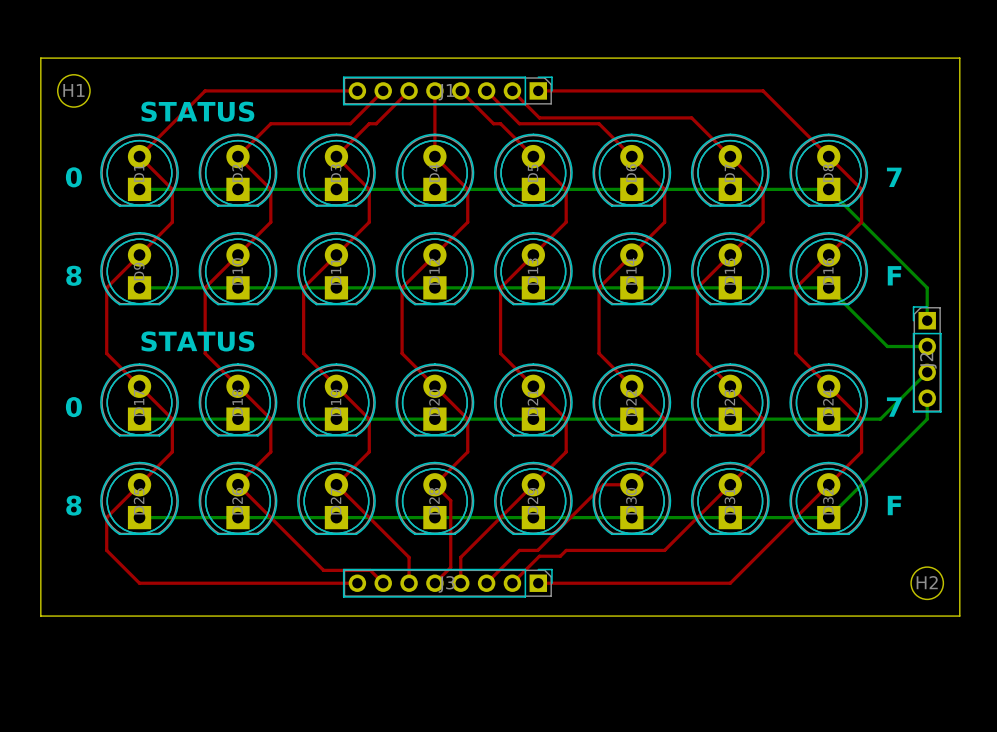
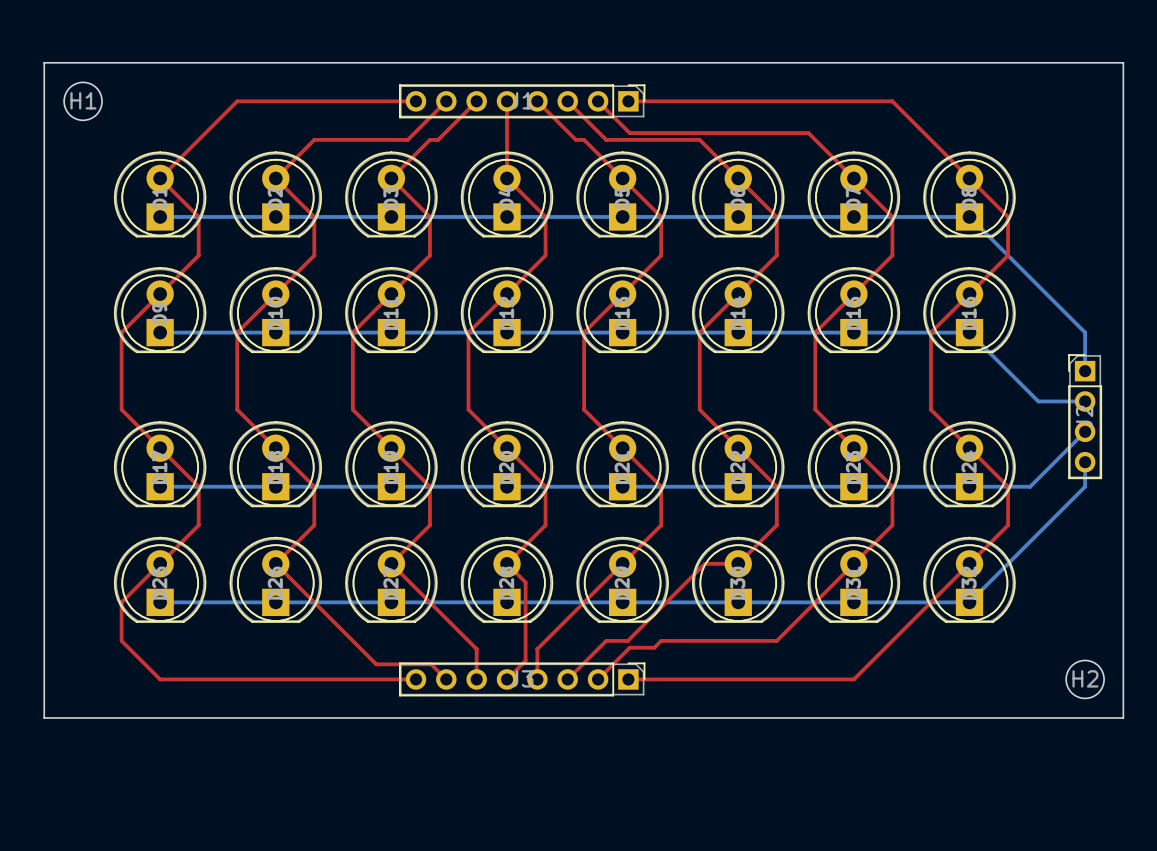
text: STATUS (197, 111) -> none
text: 0 (73, 177) -> none
text: 7 (894, 177) -> none
text: 8 (73, 275) -> none
text: F (894, 275) -> none
text: STATUS (197, 341) -> none
text: 0 (73, 407) -> none
text: 7 (894, 407) -> none
text: 8 (73, 505) -> none
text: F (894, 505) -> none

